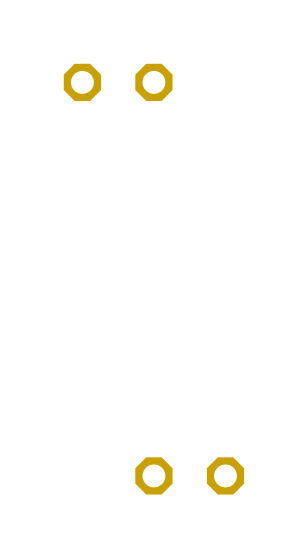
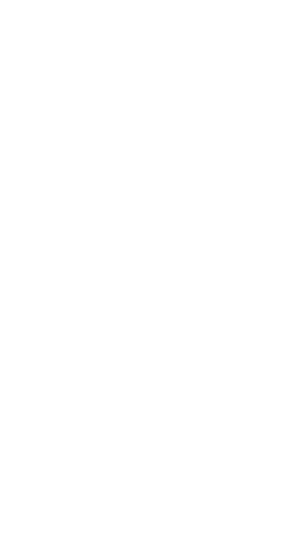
part: (118, 82) -> none
part: (189, 475) -> none

